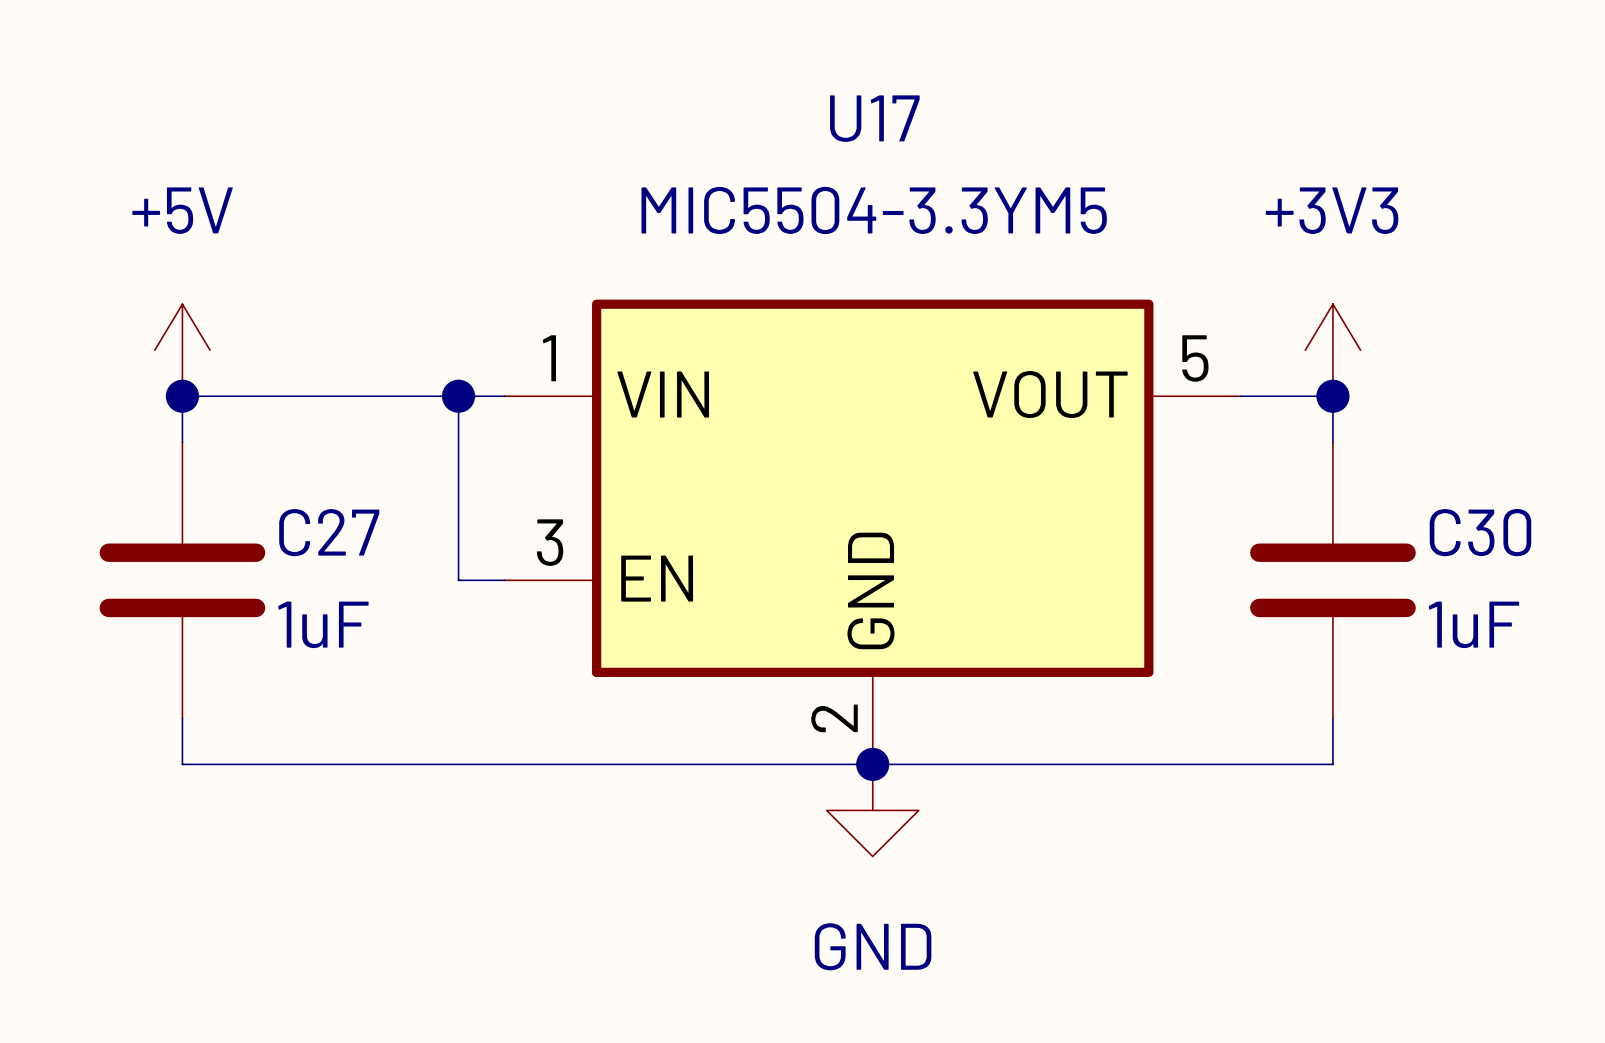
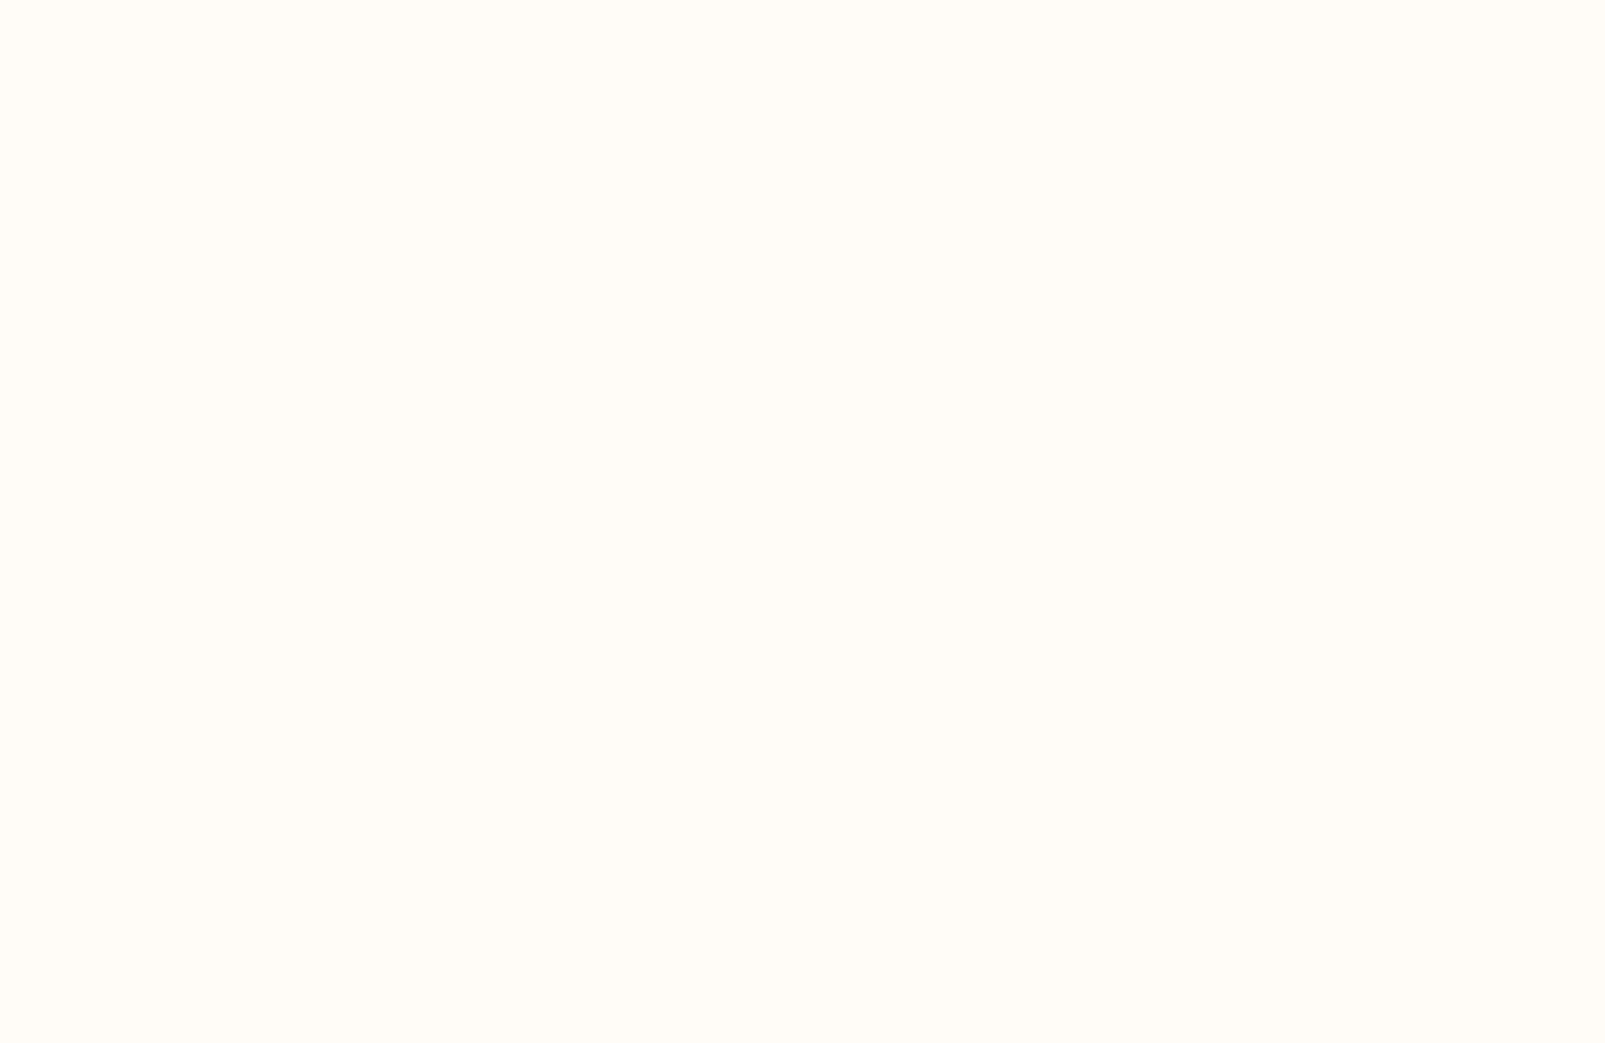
power symbol: +5V (182, 350) -> none
power symbol: +3V3 (1332, 350) -> none
junction: (182, 396) -> none
wire: (458, 396) (458, 580) (504, 580) -> none
junction: (458, 396) -> none
wire: (504, 396) (182, 396) (182, 442) -> none
wire: (1240, 396) (1332, 396) (1332, 442) -> none
junction: (1332, 396) -> none
U17: MIC5504-3.3YM5 (872, 532) -> none
C27: 1uF (182, 580) -> none
C30: 1uF (1332, 580) -> none
wire: (182, 718) (182, 764) (1332, 764) (1332, 718) -> none
junction: (872, 764) -> none
power symbol: GND (872, 810) -> none

